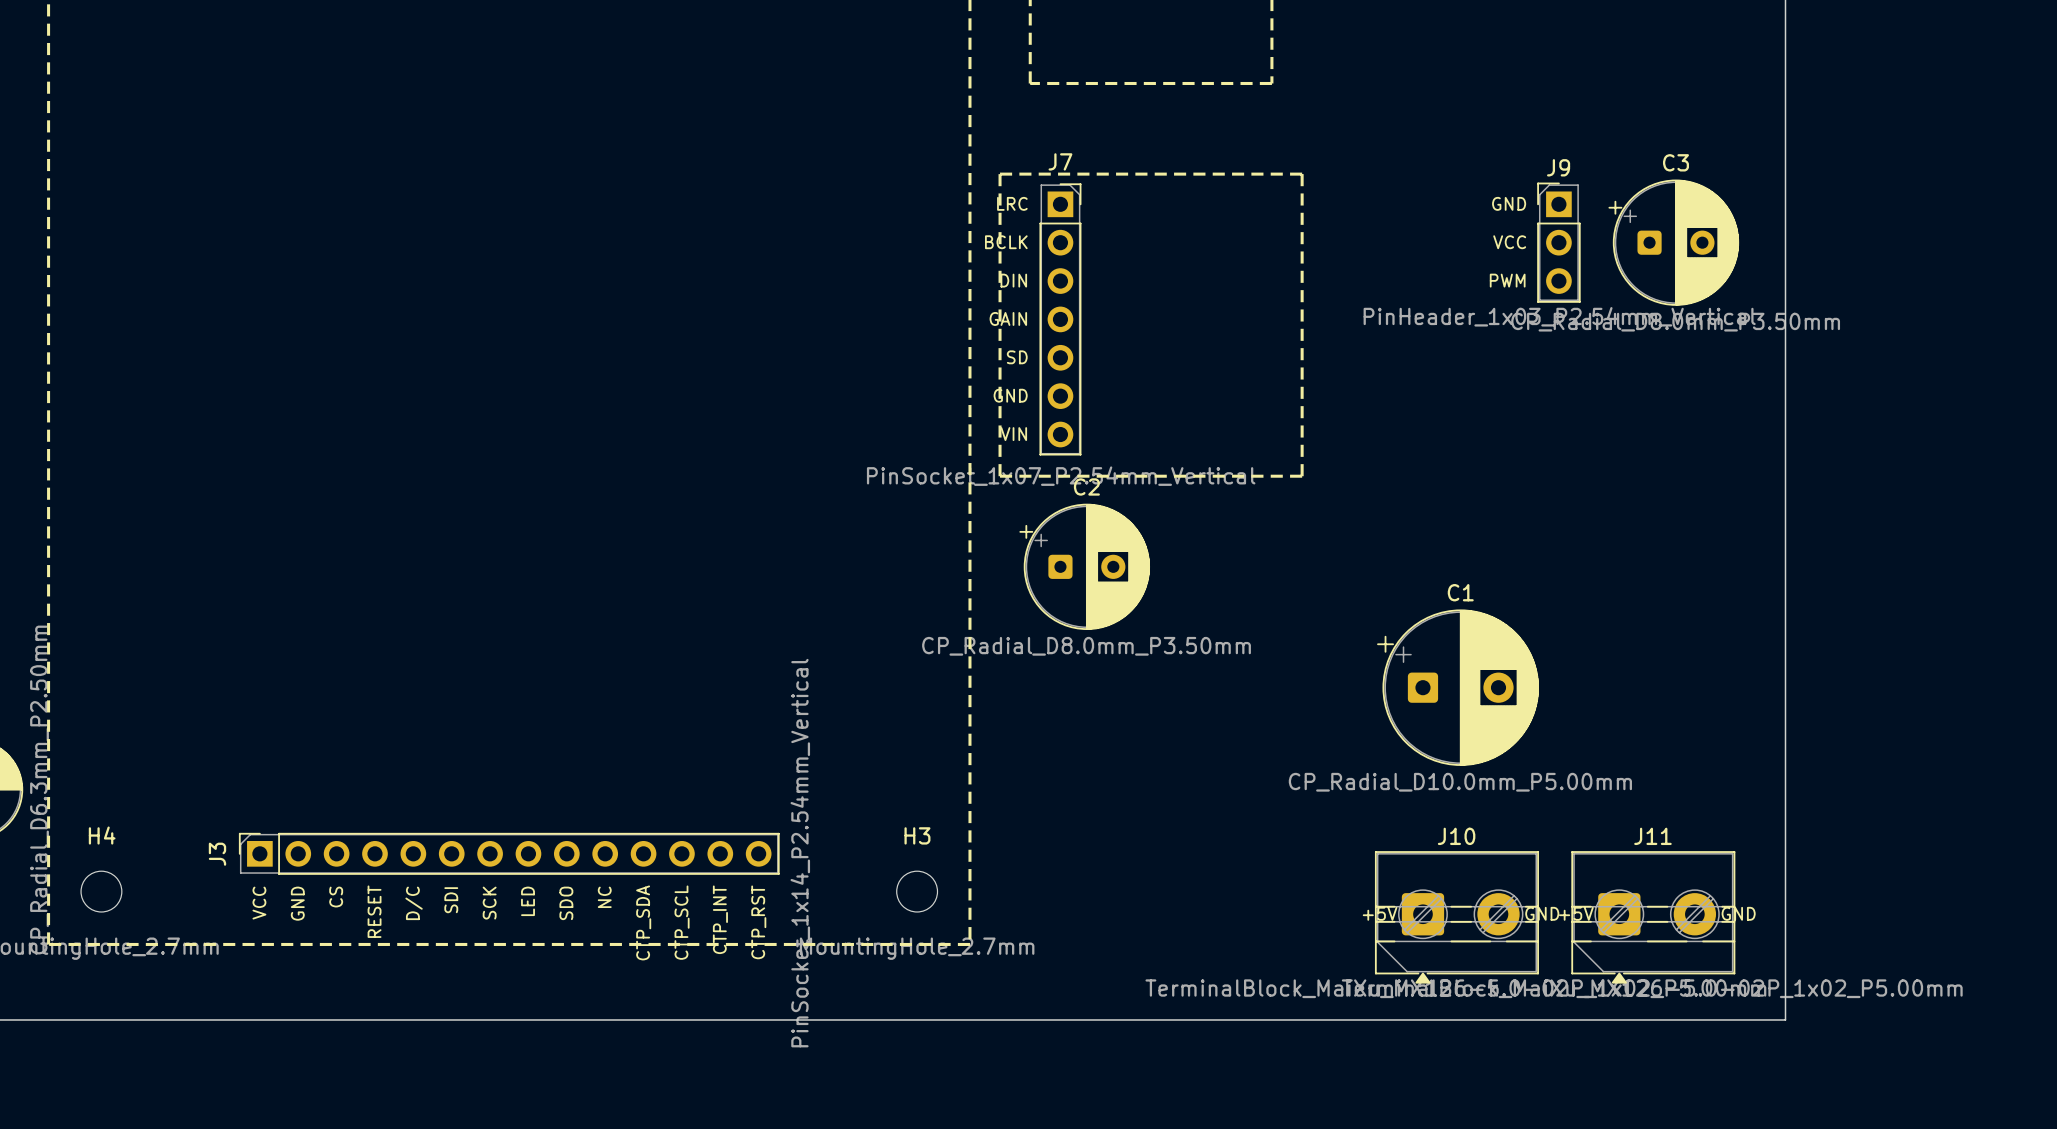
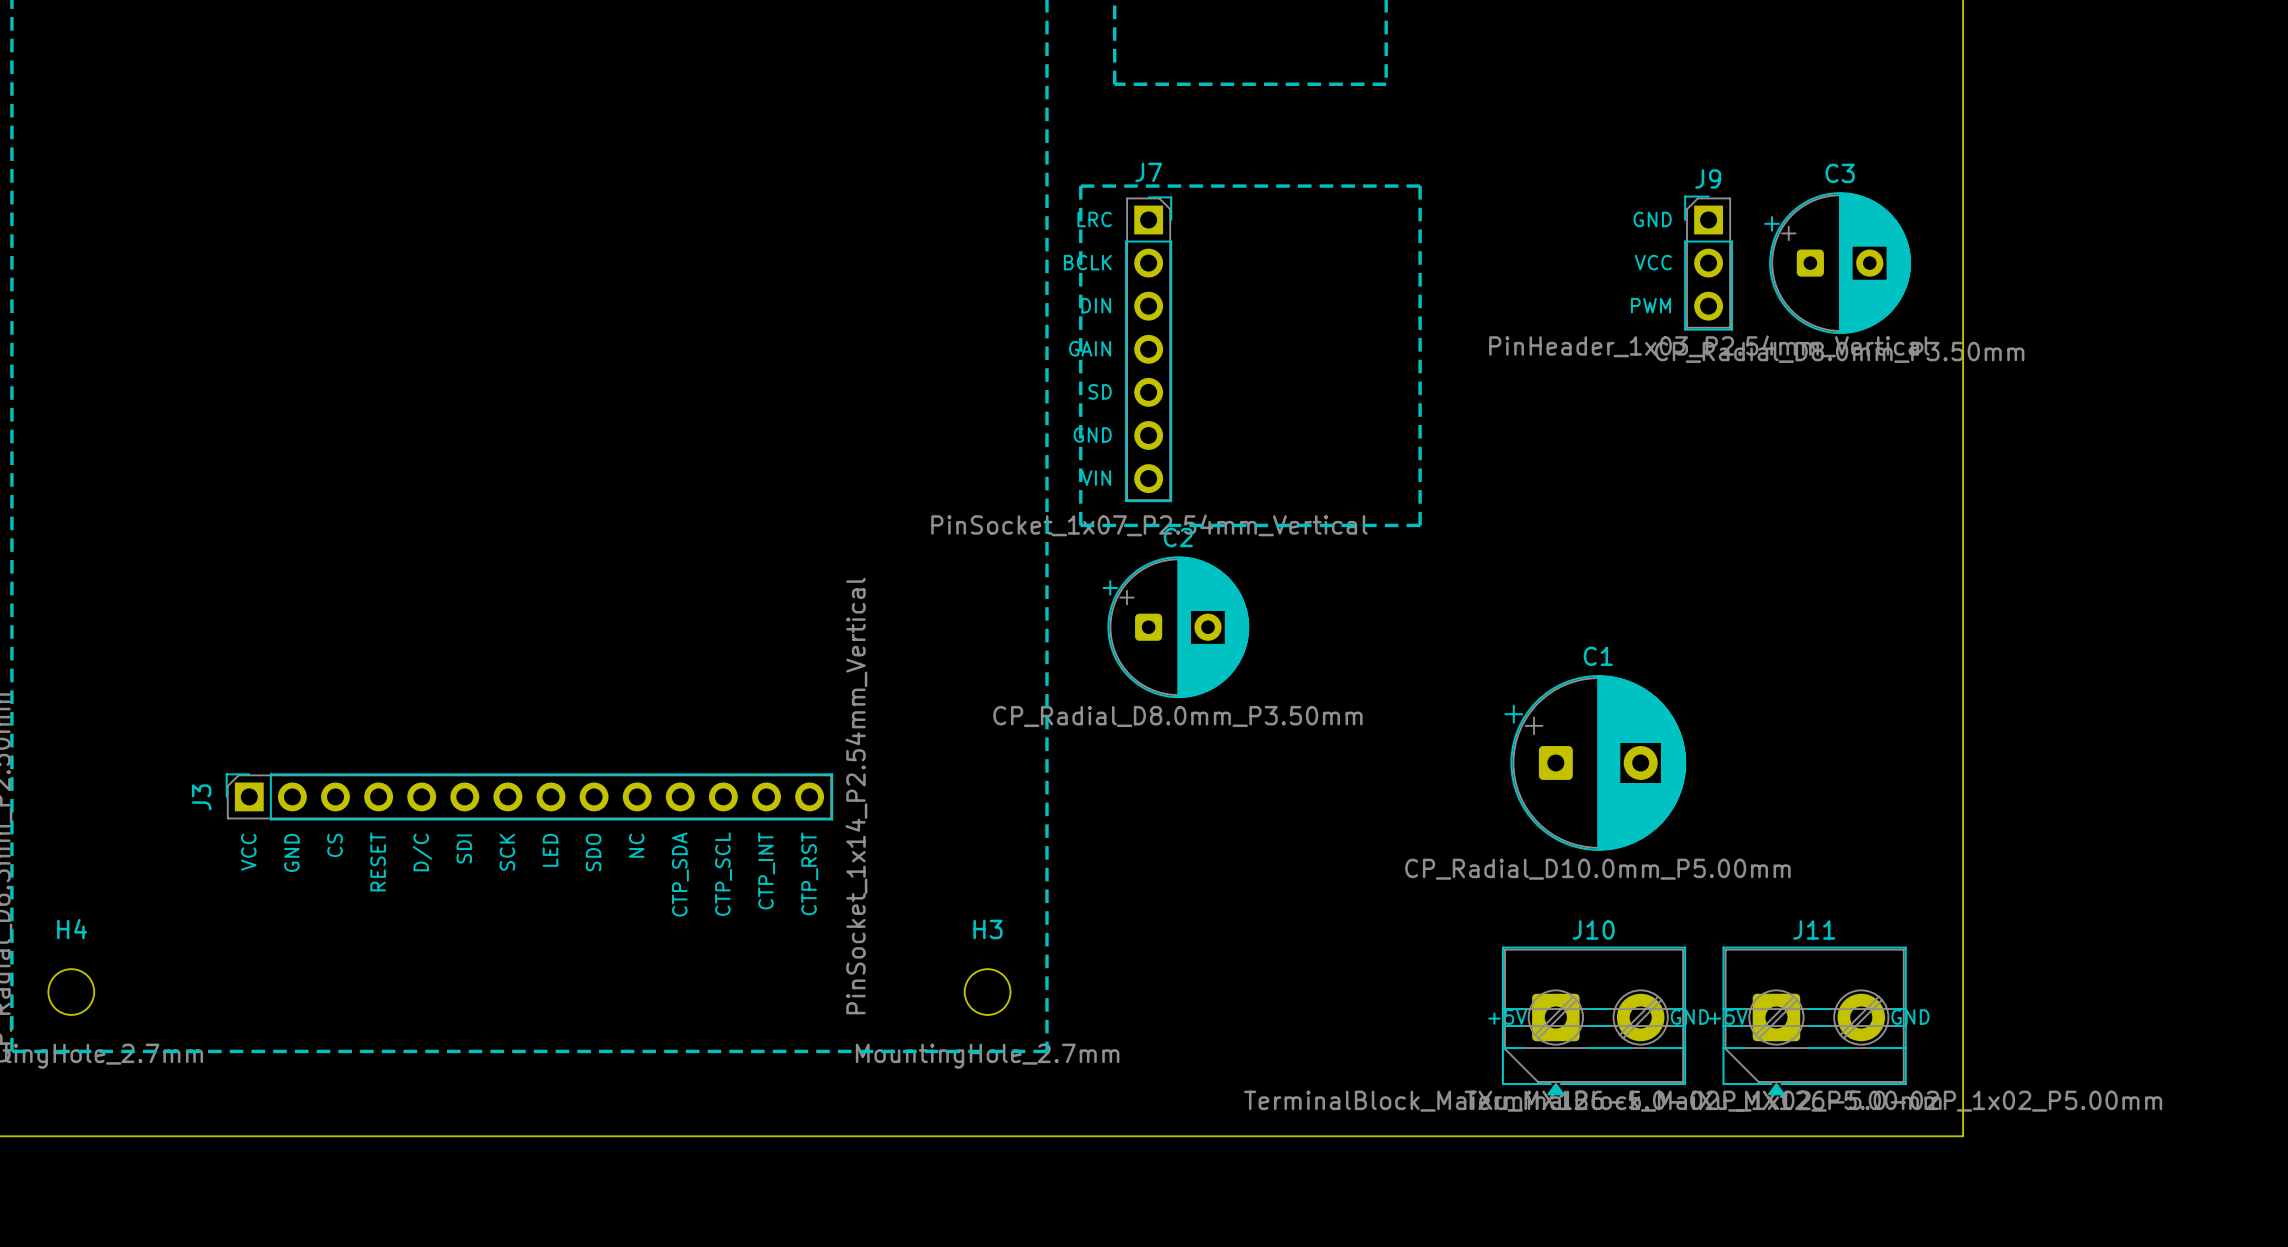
J3 position: (509, 853) -> (529, 796)
text position: CS (336, 897) -> CS (335, 845)
text position: NC (604, 897) -> NC (636, 845)
text position: SDI (451, 900) -> SDI (464, 848)
text position: LED (528, 901) -> LED (550, 850)
text position: VCC (259, 903) -> VCC (248, 852)
text position: GND (297, 903) -> GND (291, 852)
text position: D/C (414, 903) -> D/C (422, 852)
text position: SCK (489, 903) -> SCK (507, 852)
text position: SDO (566, 903) -> SDO (593, 852)
text position: RESET (374, 911) -> RESET (378, 861)
text position: CTP_INT (720, 919) -> CTP_INT (766, 870)
text position: CTP_SDA (643, 922) -> CTP_SDA (680, 874)
text position: CTP_SCL (682, 922) -> CTP_SCL (723, 874)
text position: CTP_RST (758, 922) -> CTP_RST (809, 873)

